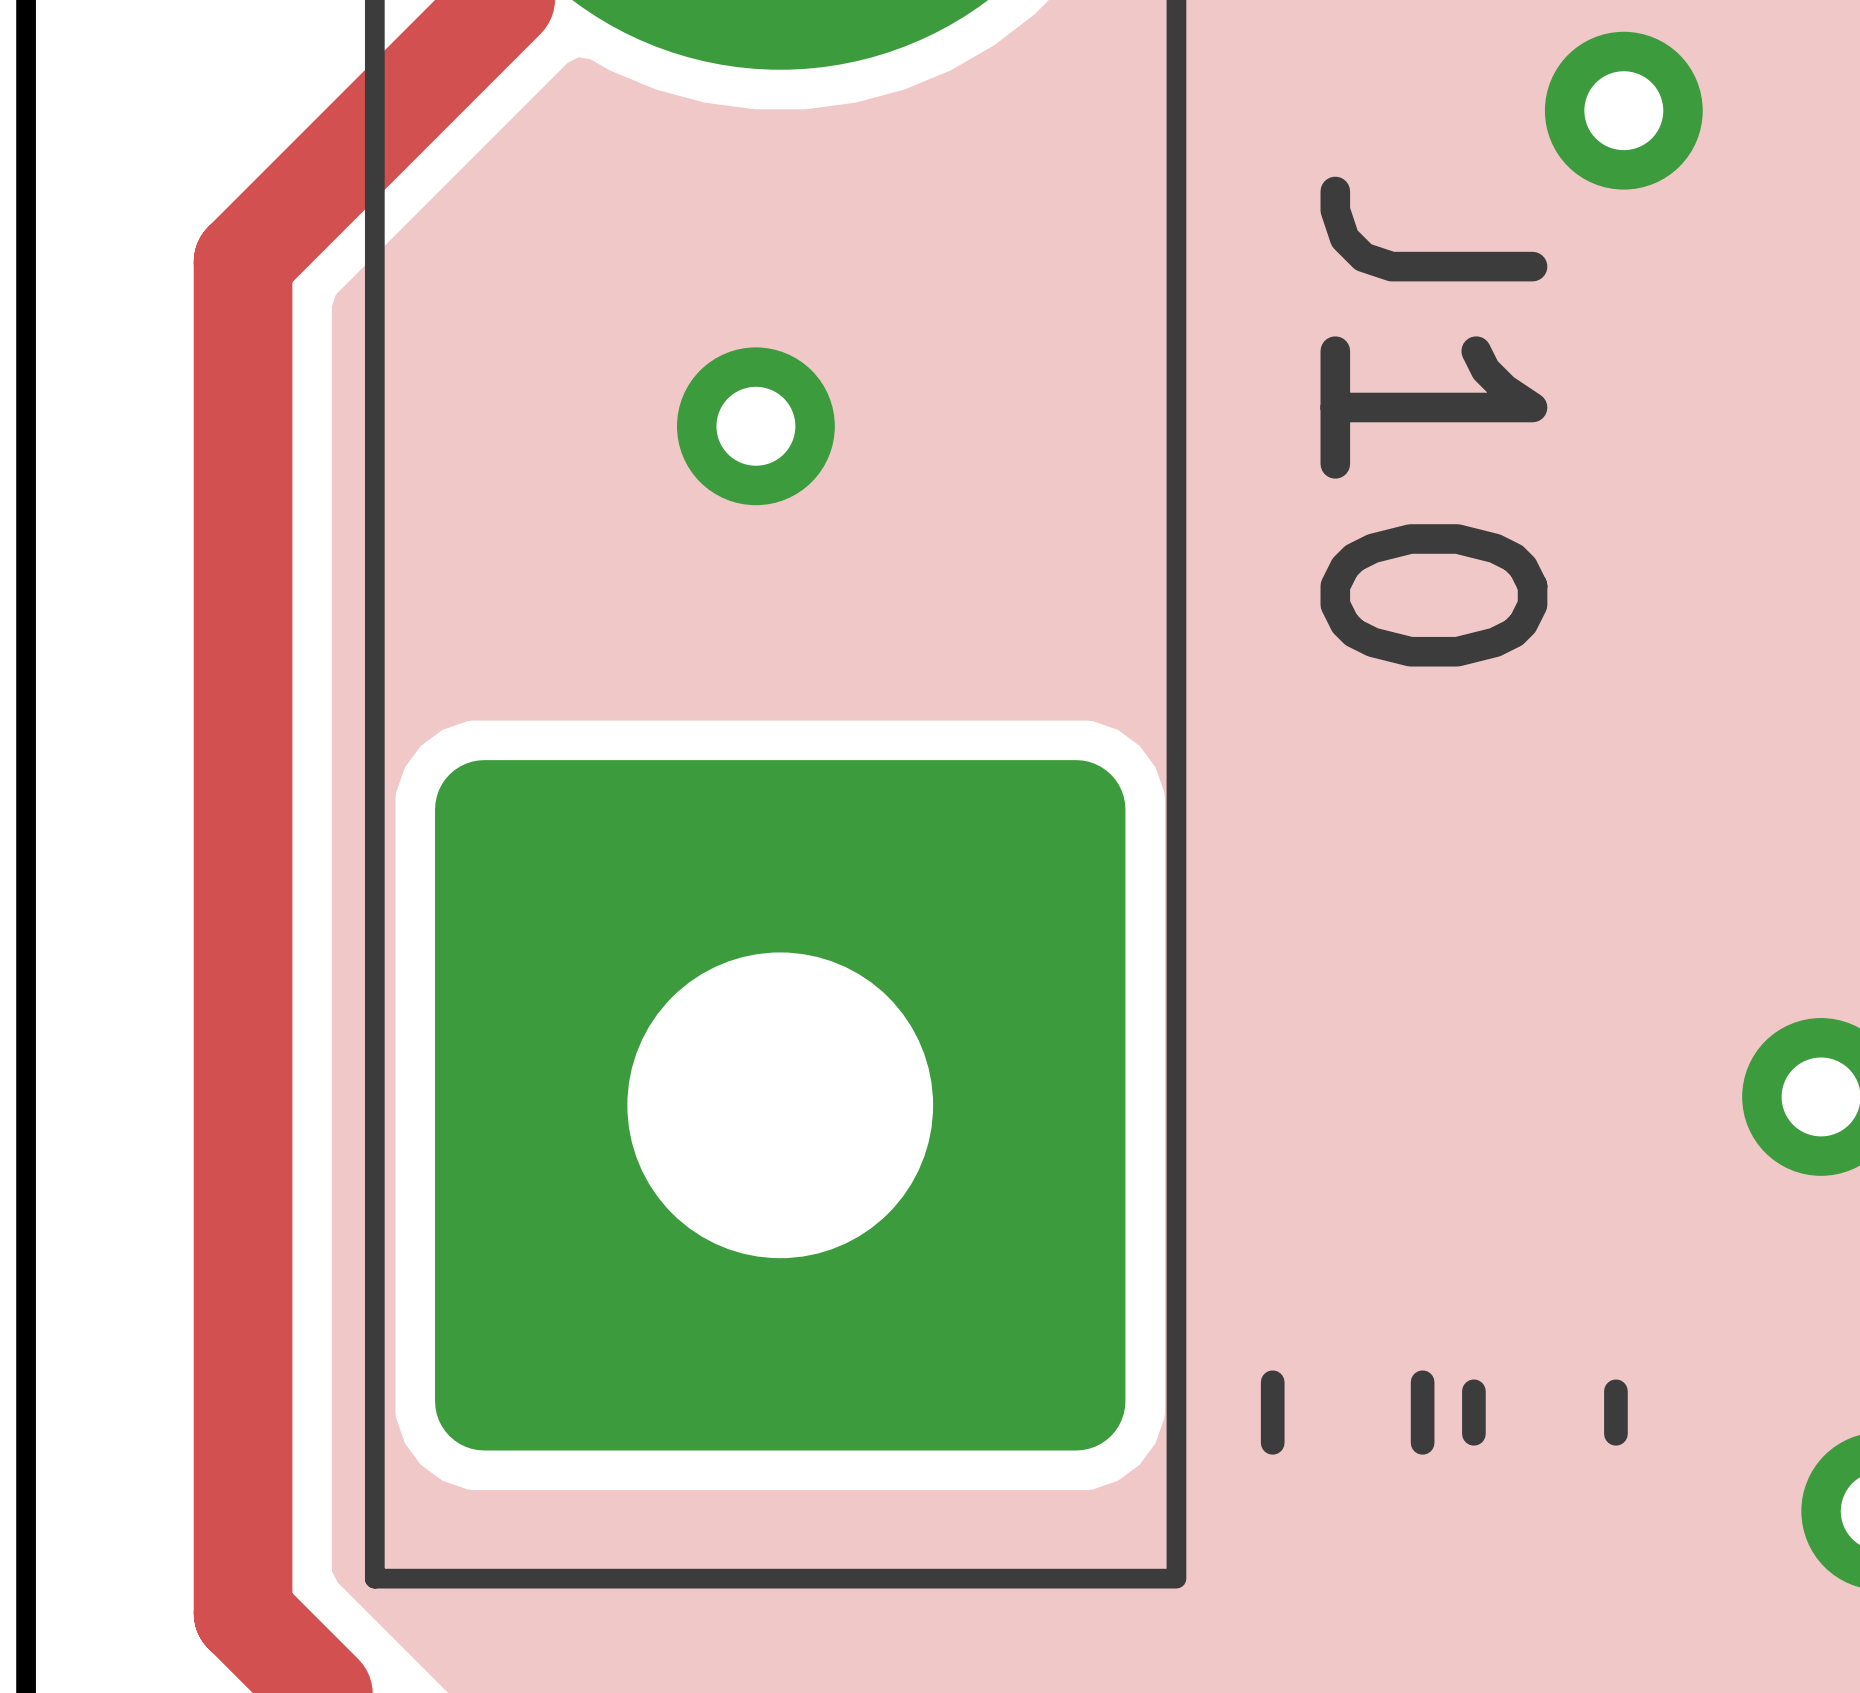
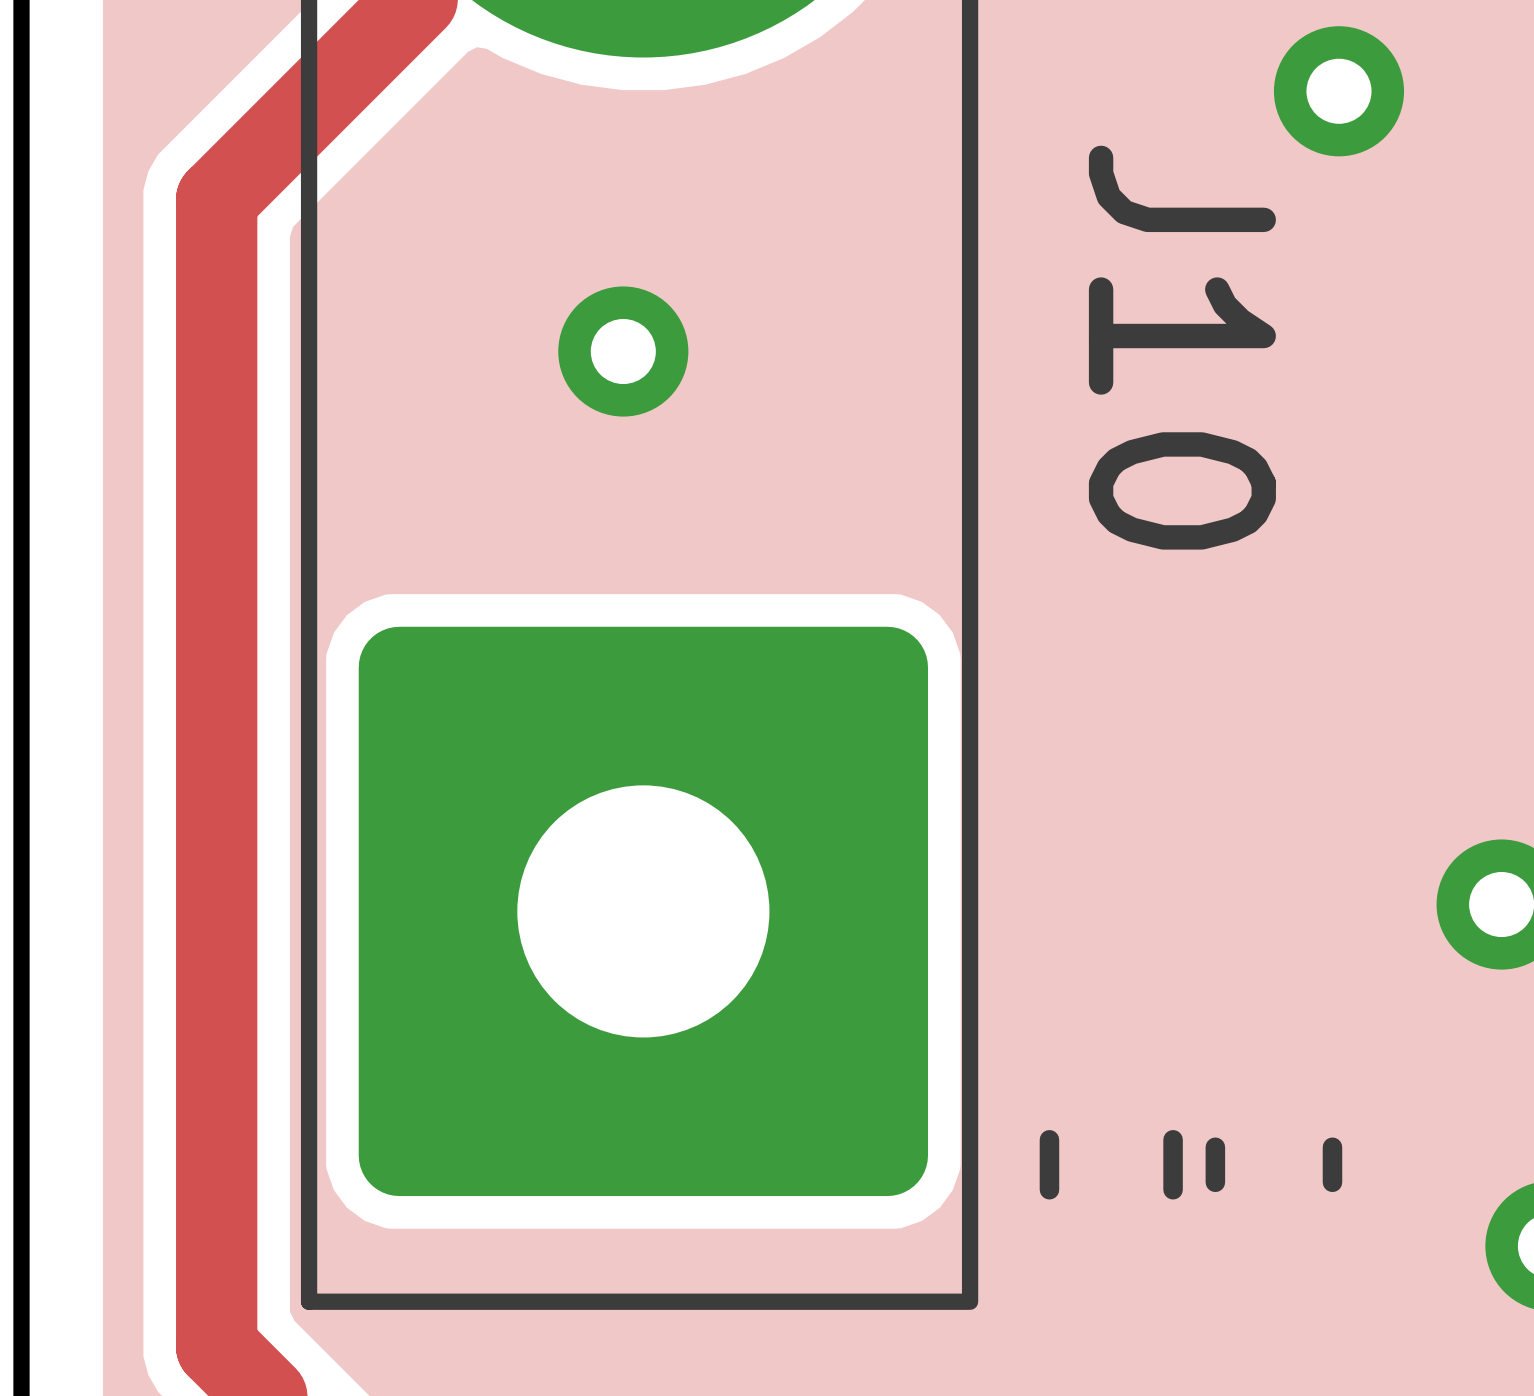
track: (262, 242) (243, 261) (243, 1613) (262, 1633) -> (216, 199) (216, 1346)

